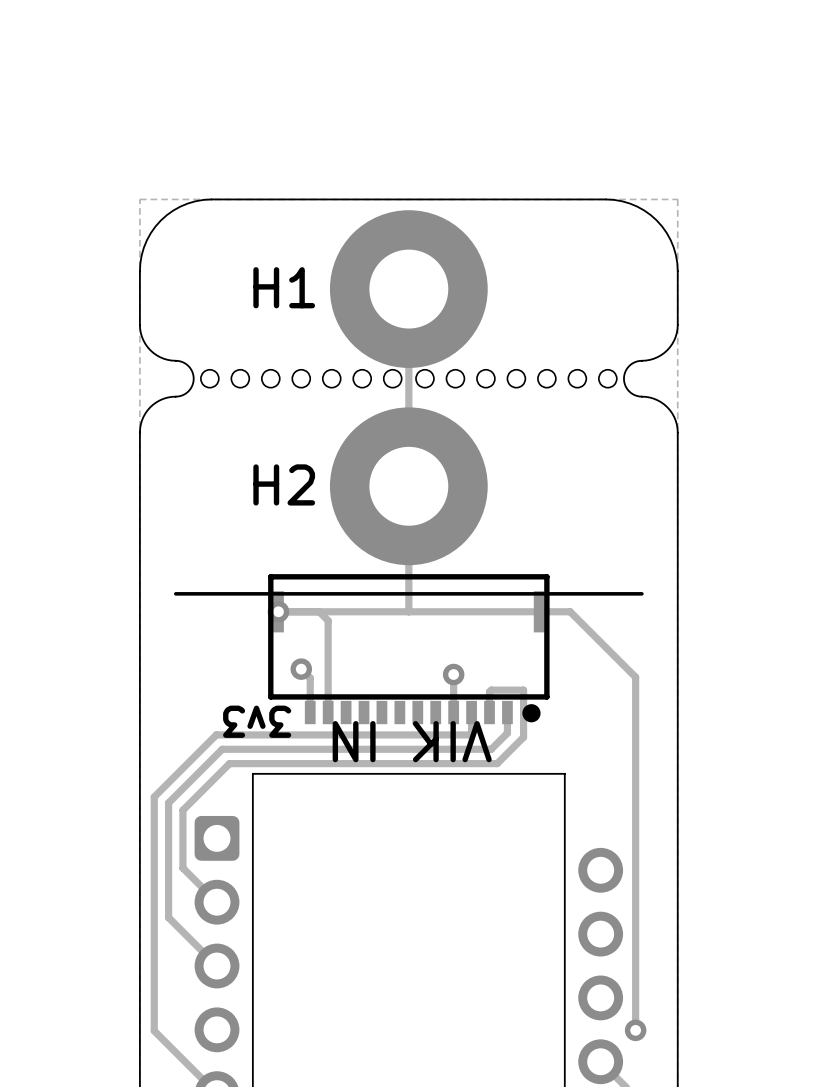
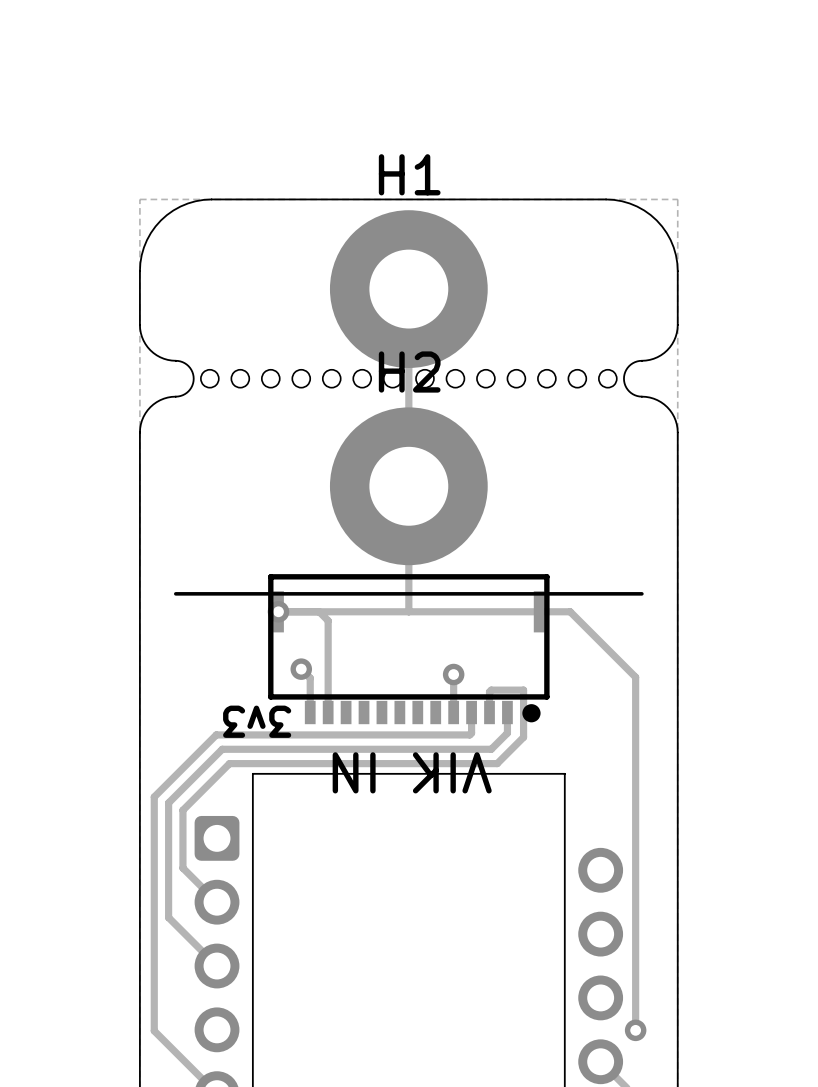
H1 name position: H1 (284, 287) -> H1 (409, 174)
H2 name position: H2 (284, 484) -> H2 (409, 372)
part text position: VIK IN (412, 741) -> VIK IN (412, 772)

